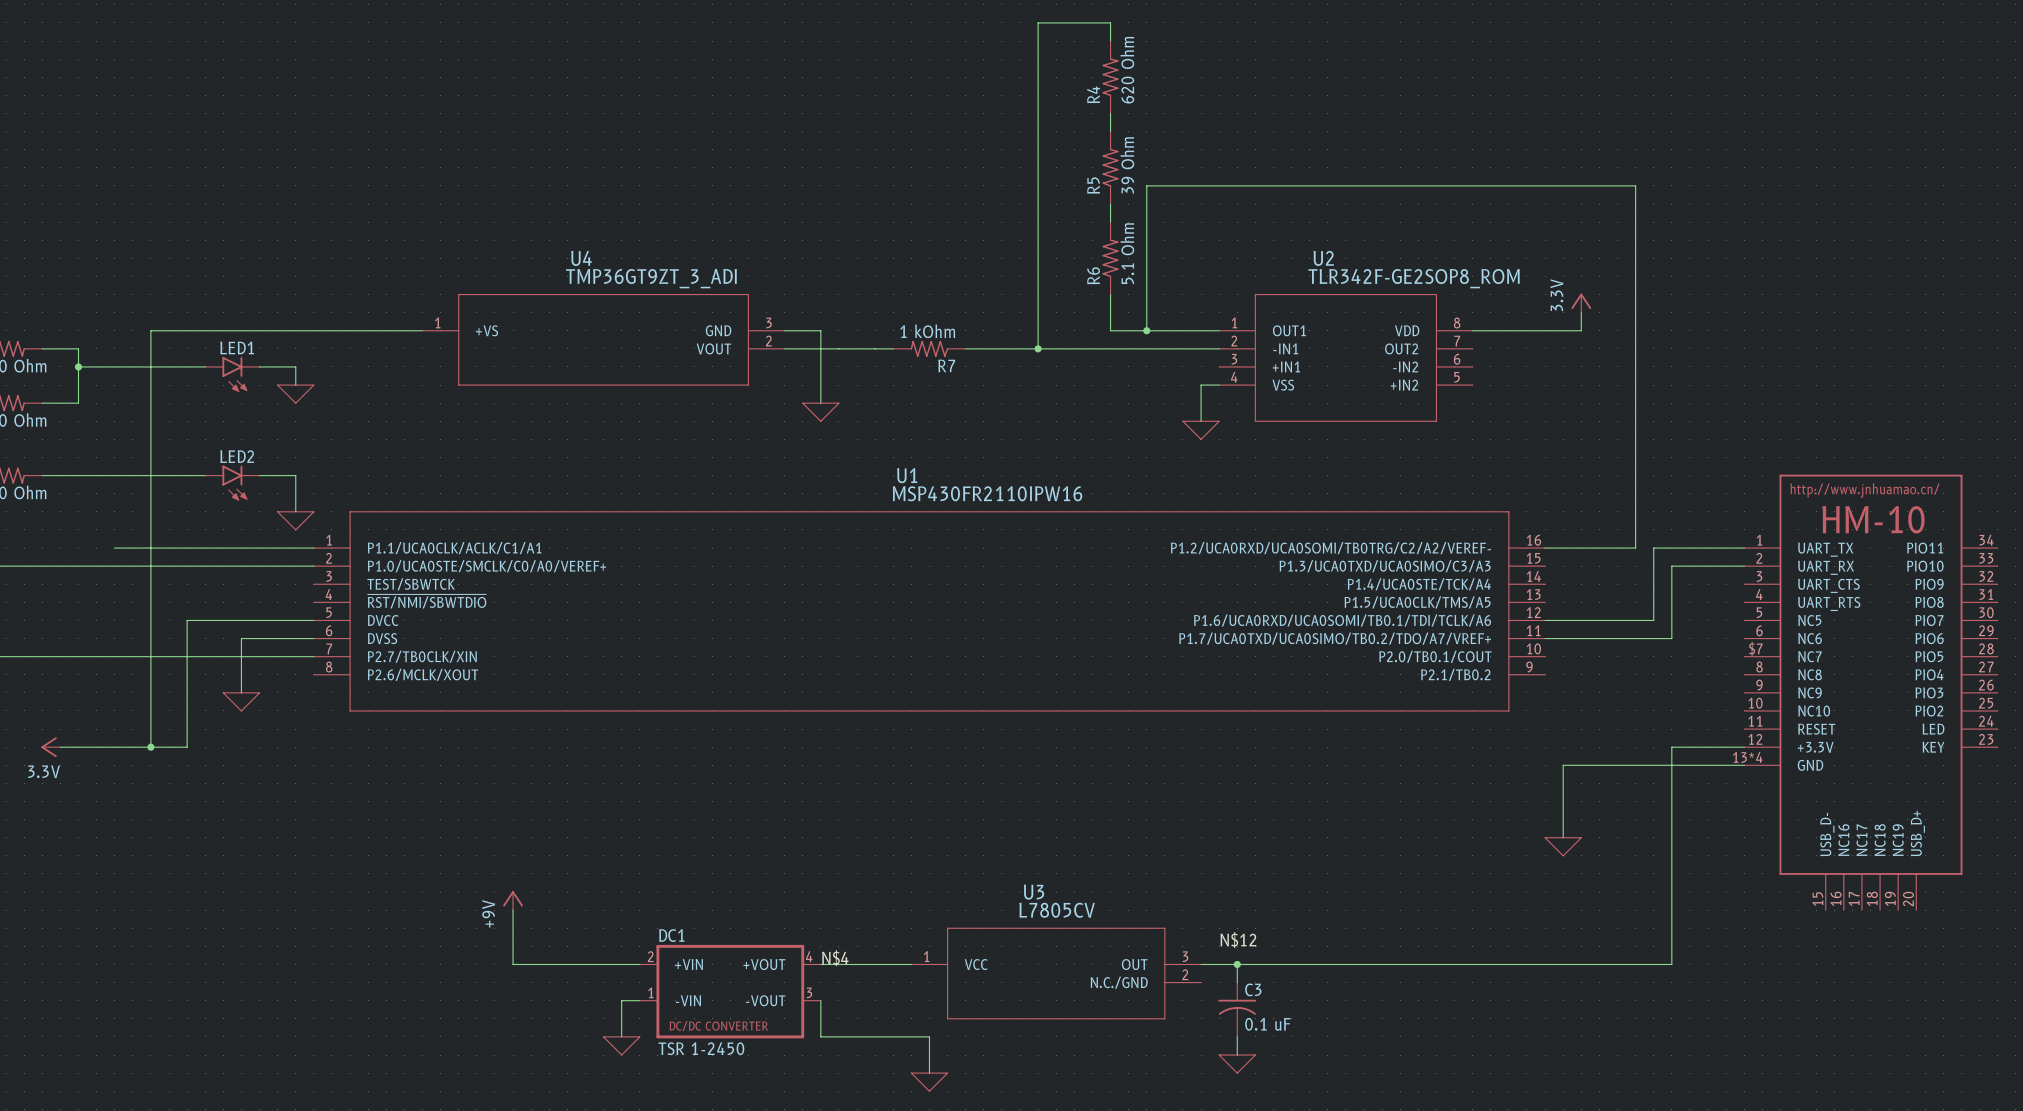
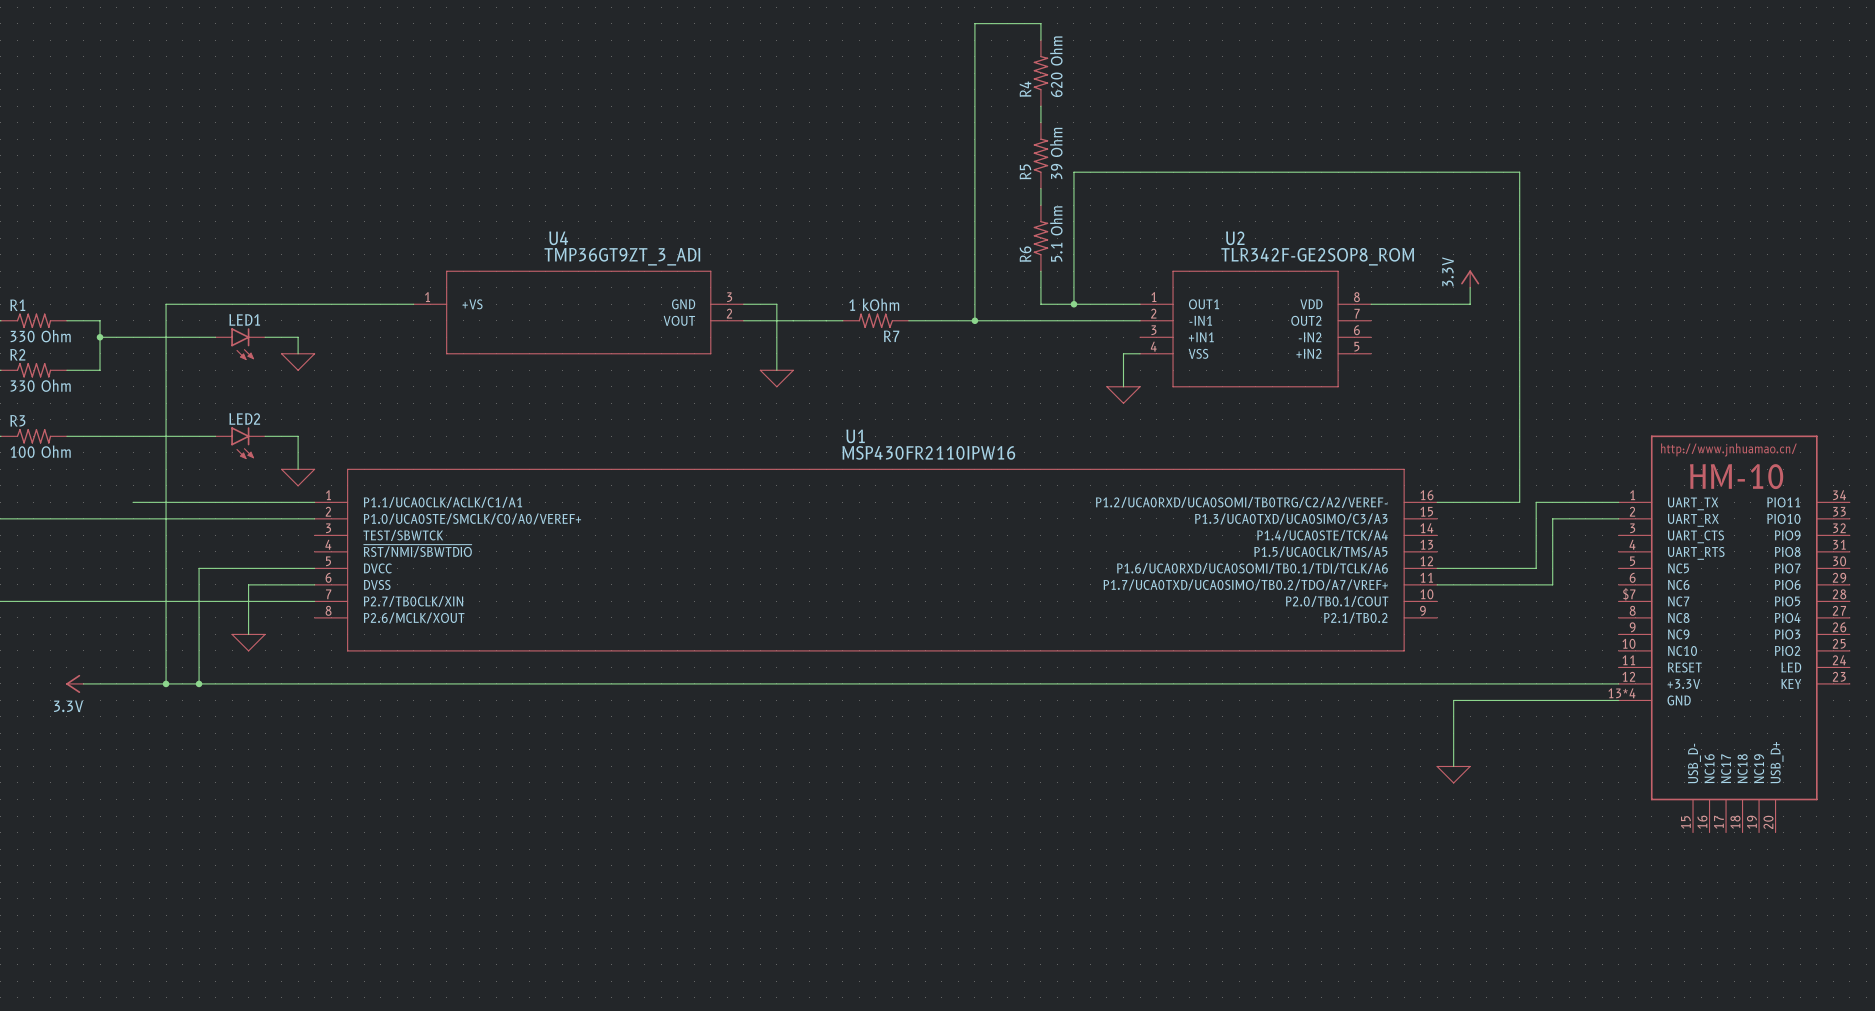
junction: none -> (199, 683)
wire: (1671, 747) (1671, 964) (1201, 964) -> (1552, 683) (199, 683)
power symbol: +9V (513, 900) -> none
wire: (513, 910) (513, 964) (639, 964) -> none
label: N$12 (1238, 940) -> none
label: N$4 (835, 958) -> none
wire: (820, 964) (911, 964) -> none
wire: (1237, 964) (1237, 982) -> none
junction: (1237, 964) -> none
U3: L7805CV (1056, 973) -> none
DC1: TSR 1-2450 (730, 991) -> none
wire: (639, 1000) (621, 1000) (621, 1036) -> none
wire: (820, 1000) (820, 1036) (929, 1036) (929, 1073) -> none
C3: 0.1 uF (1237, 1009) -> none
wire: (1237, 1036) (1237, 1055) -> none
power symbol: (621, 1045) -> none
power symbol: (1237, 1064) -> none
power symbol: (929, 1082) -> none

